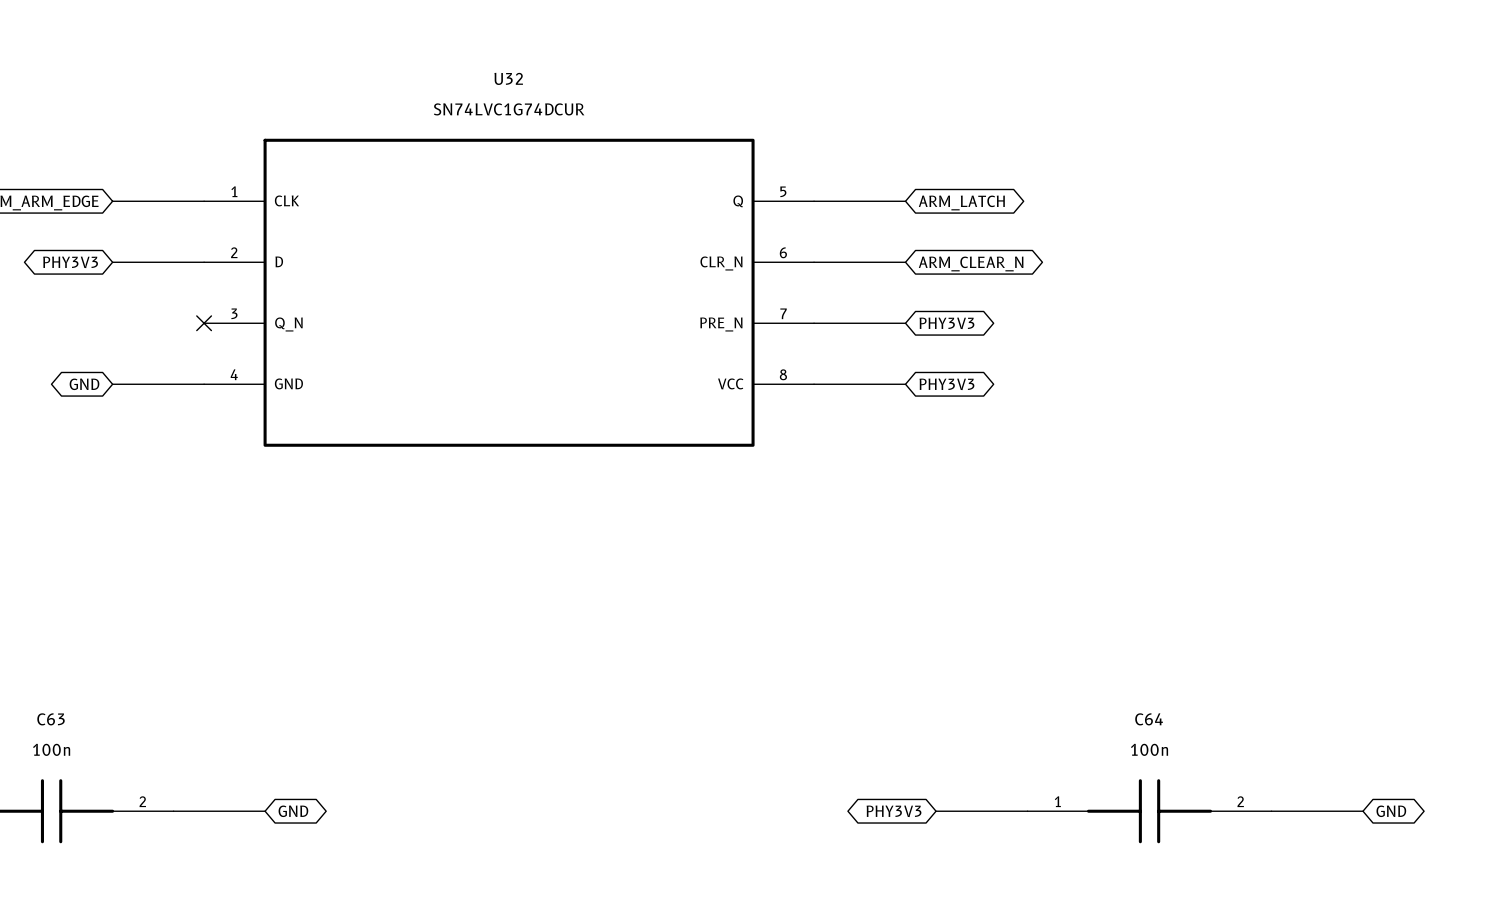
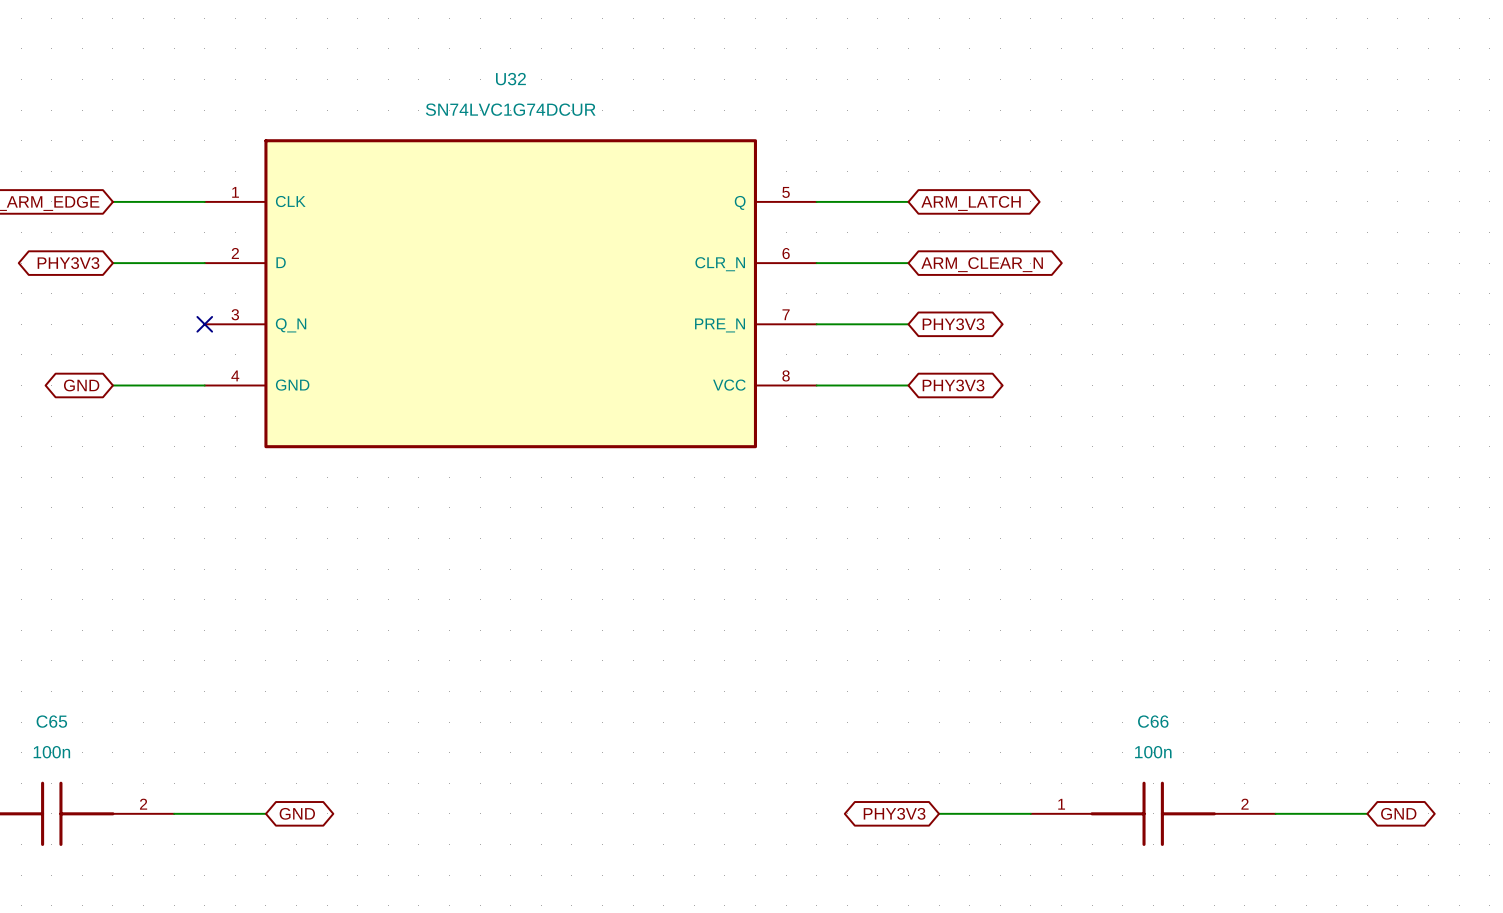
C63 name: C63 (51, 719) -> C65 (51, 721)
C64 name: C64 (1149, 719) -> C66 (1153, 721)

